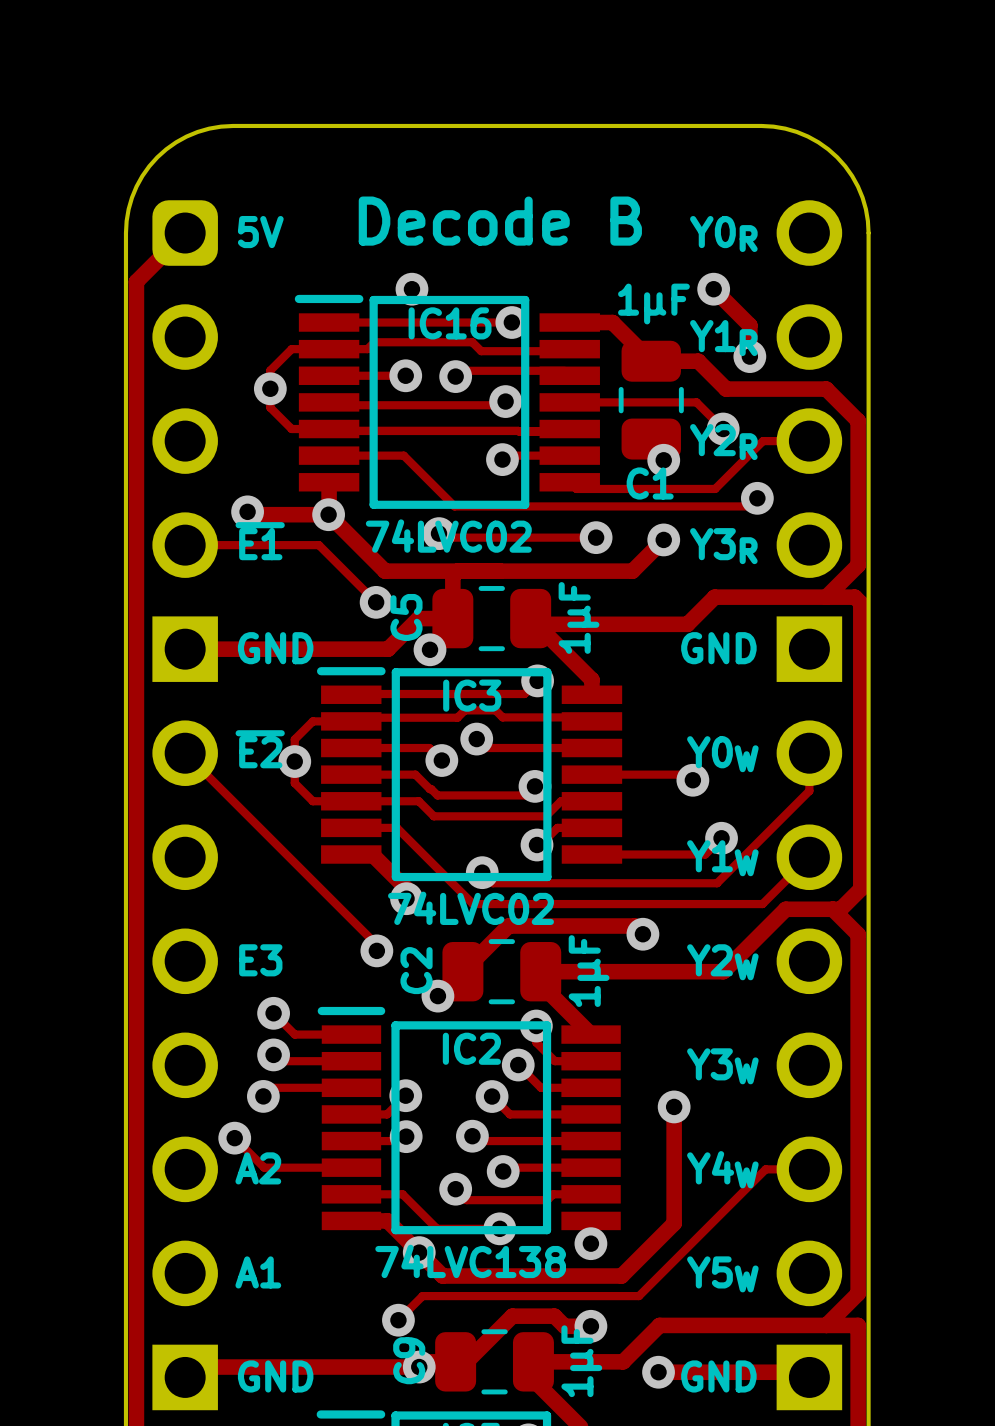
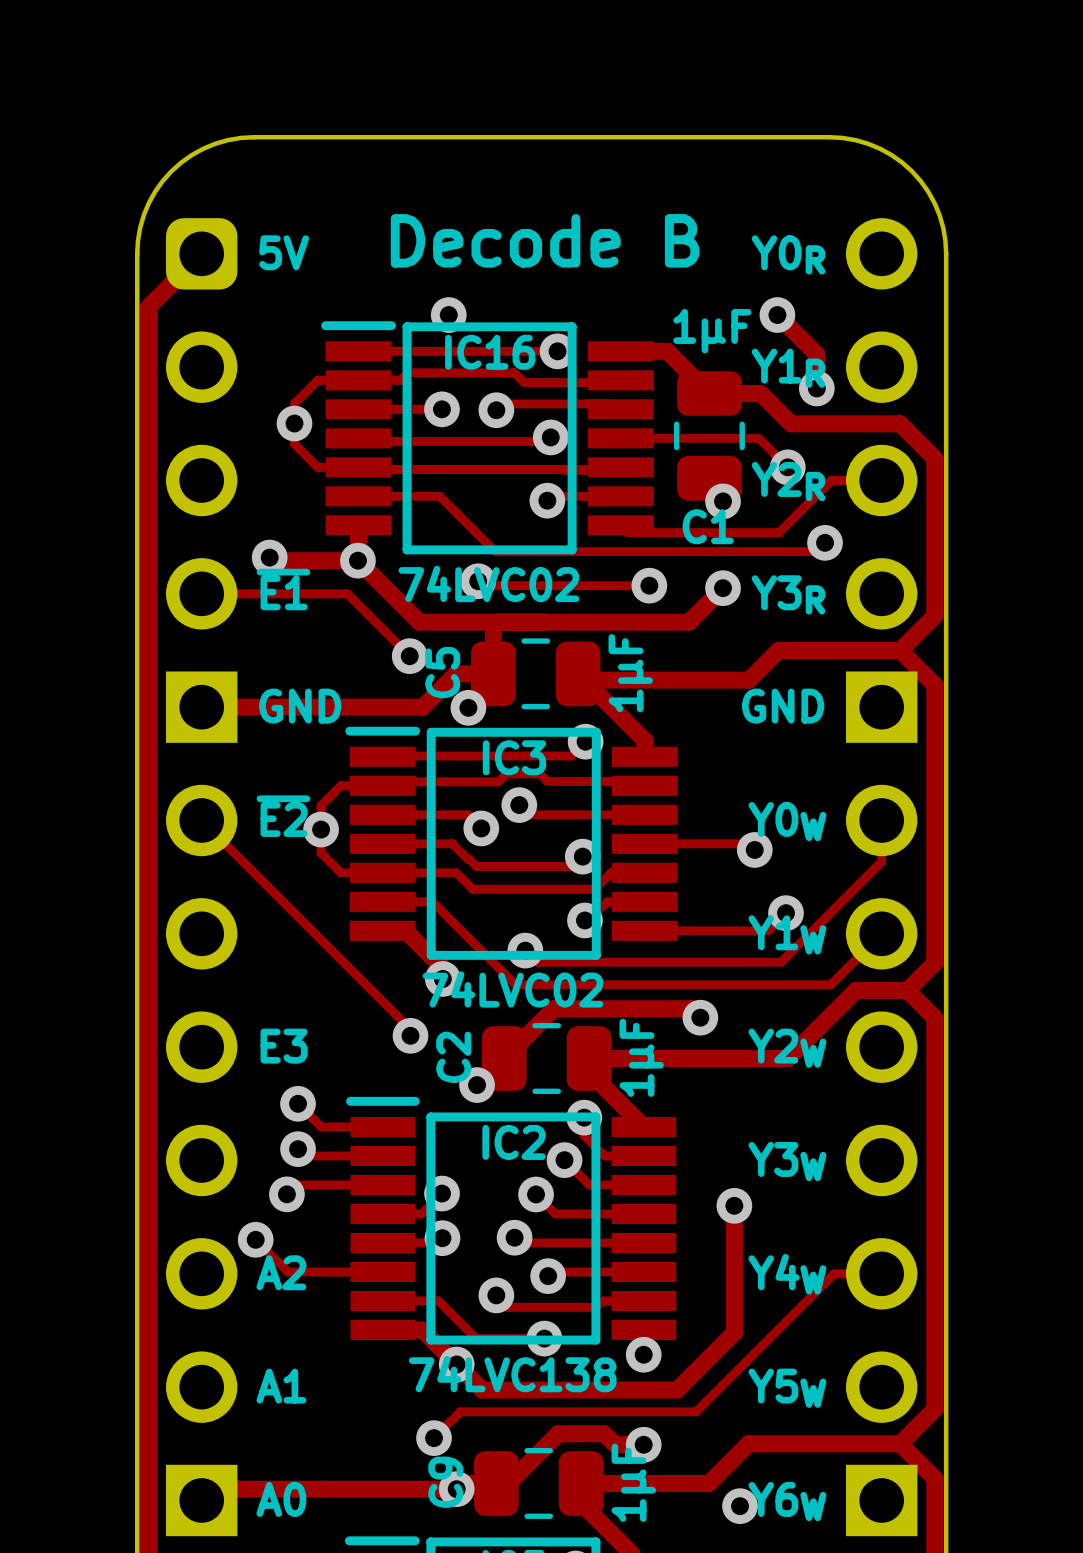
track: (826, 597) (854, 597) (860, 603) (860, 889) (840, 909) (832, 909) -> (900, 650) (934, 685) (934, 962) (907, 990)
track: (687, 1325) (659, 1325) (623, 1361) -> (748, 1443) (708, 1483) (678, 1483)
track: (826, 1325) (858, 1325) (858, 1357) -> (900, 1443) (934, 1478)
track: (658, 1372) (804, 1372) -> none
via position: (658, 1372) -> (740, 1506)
text: GND (275, 1376) -> A0 (281, 1499)
text: GND (718, 1376) -> Y6W (787, 1501)

